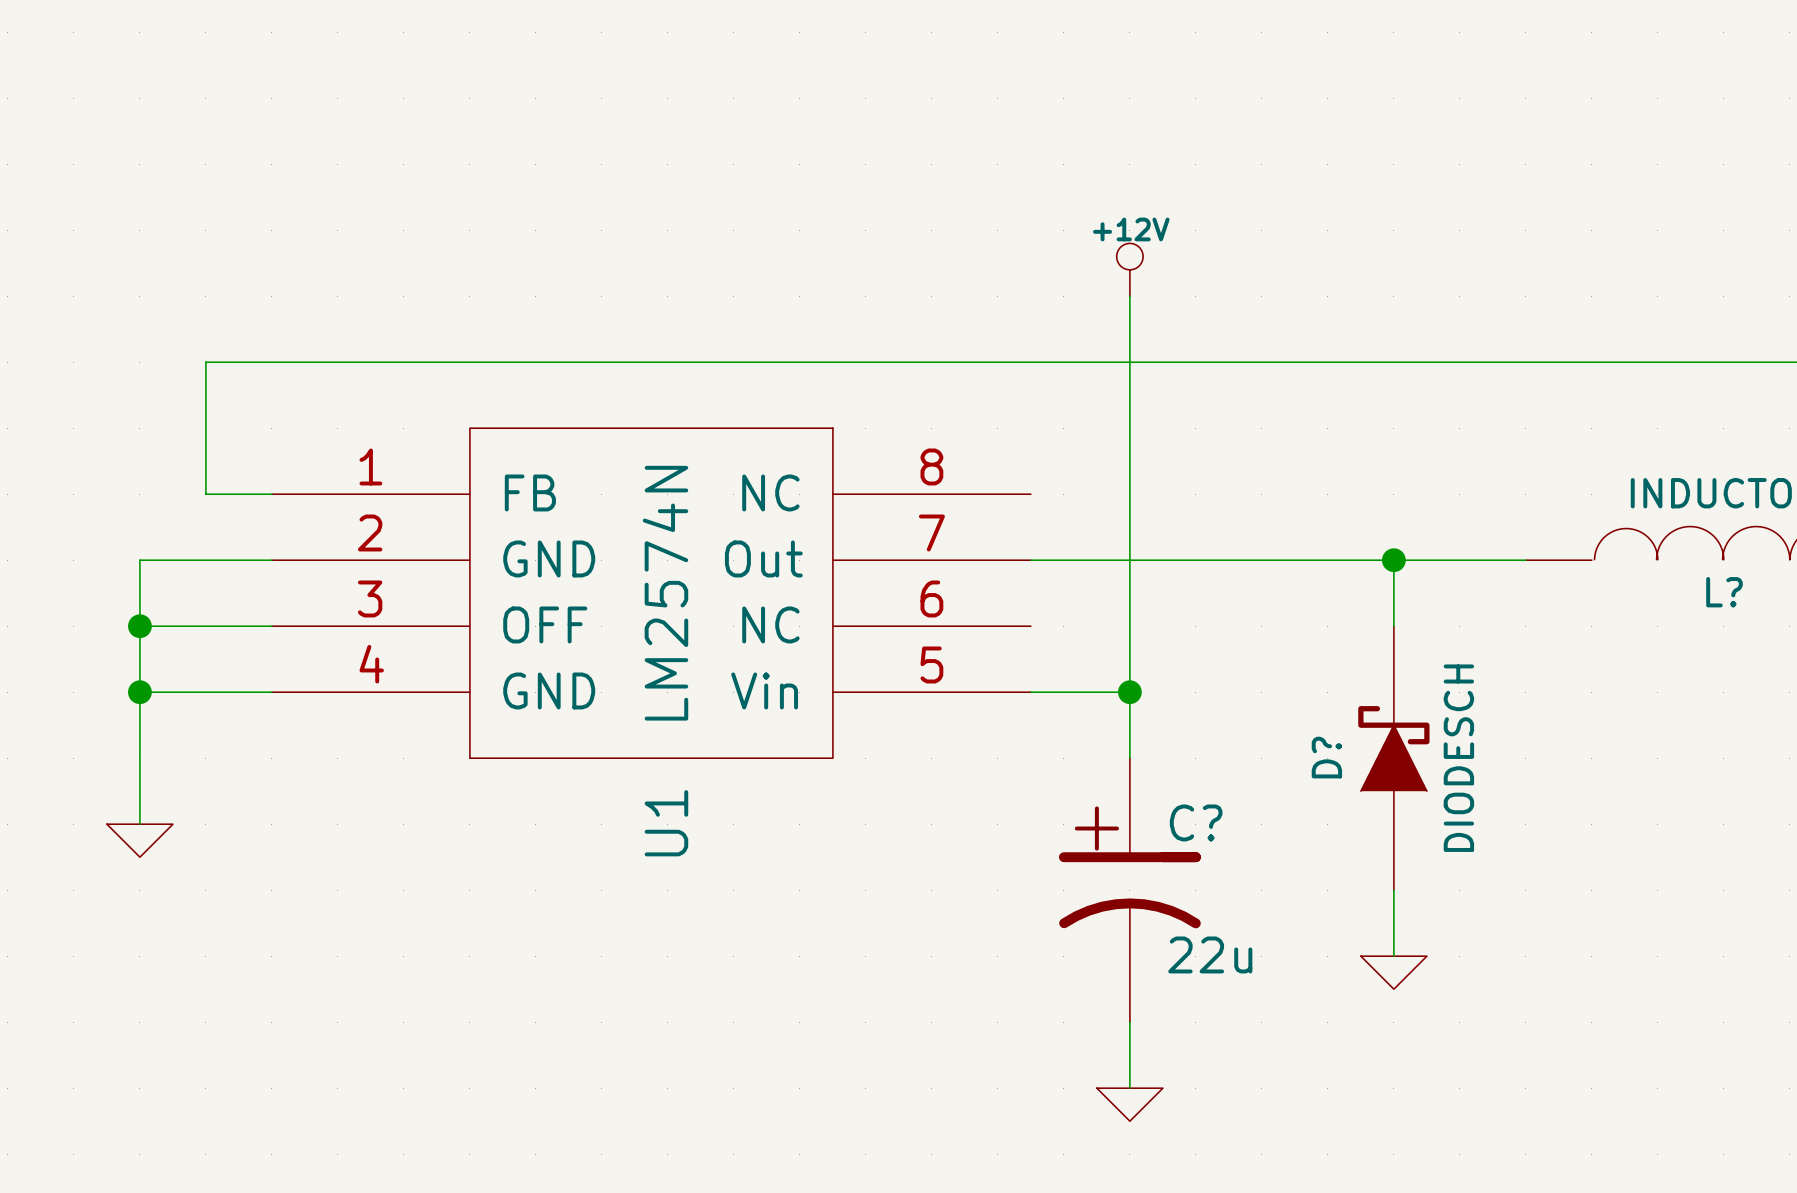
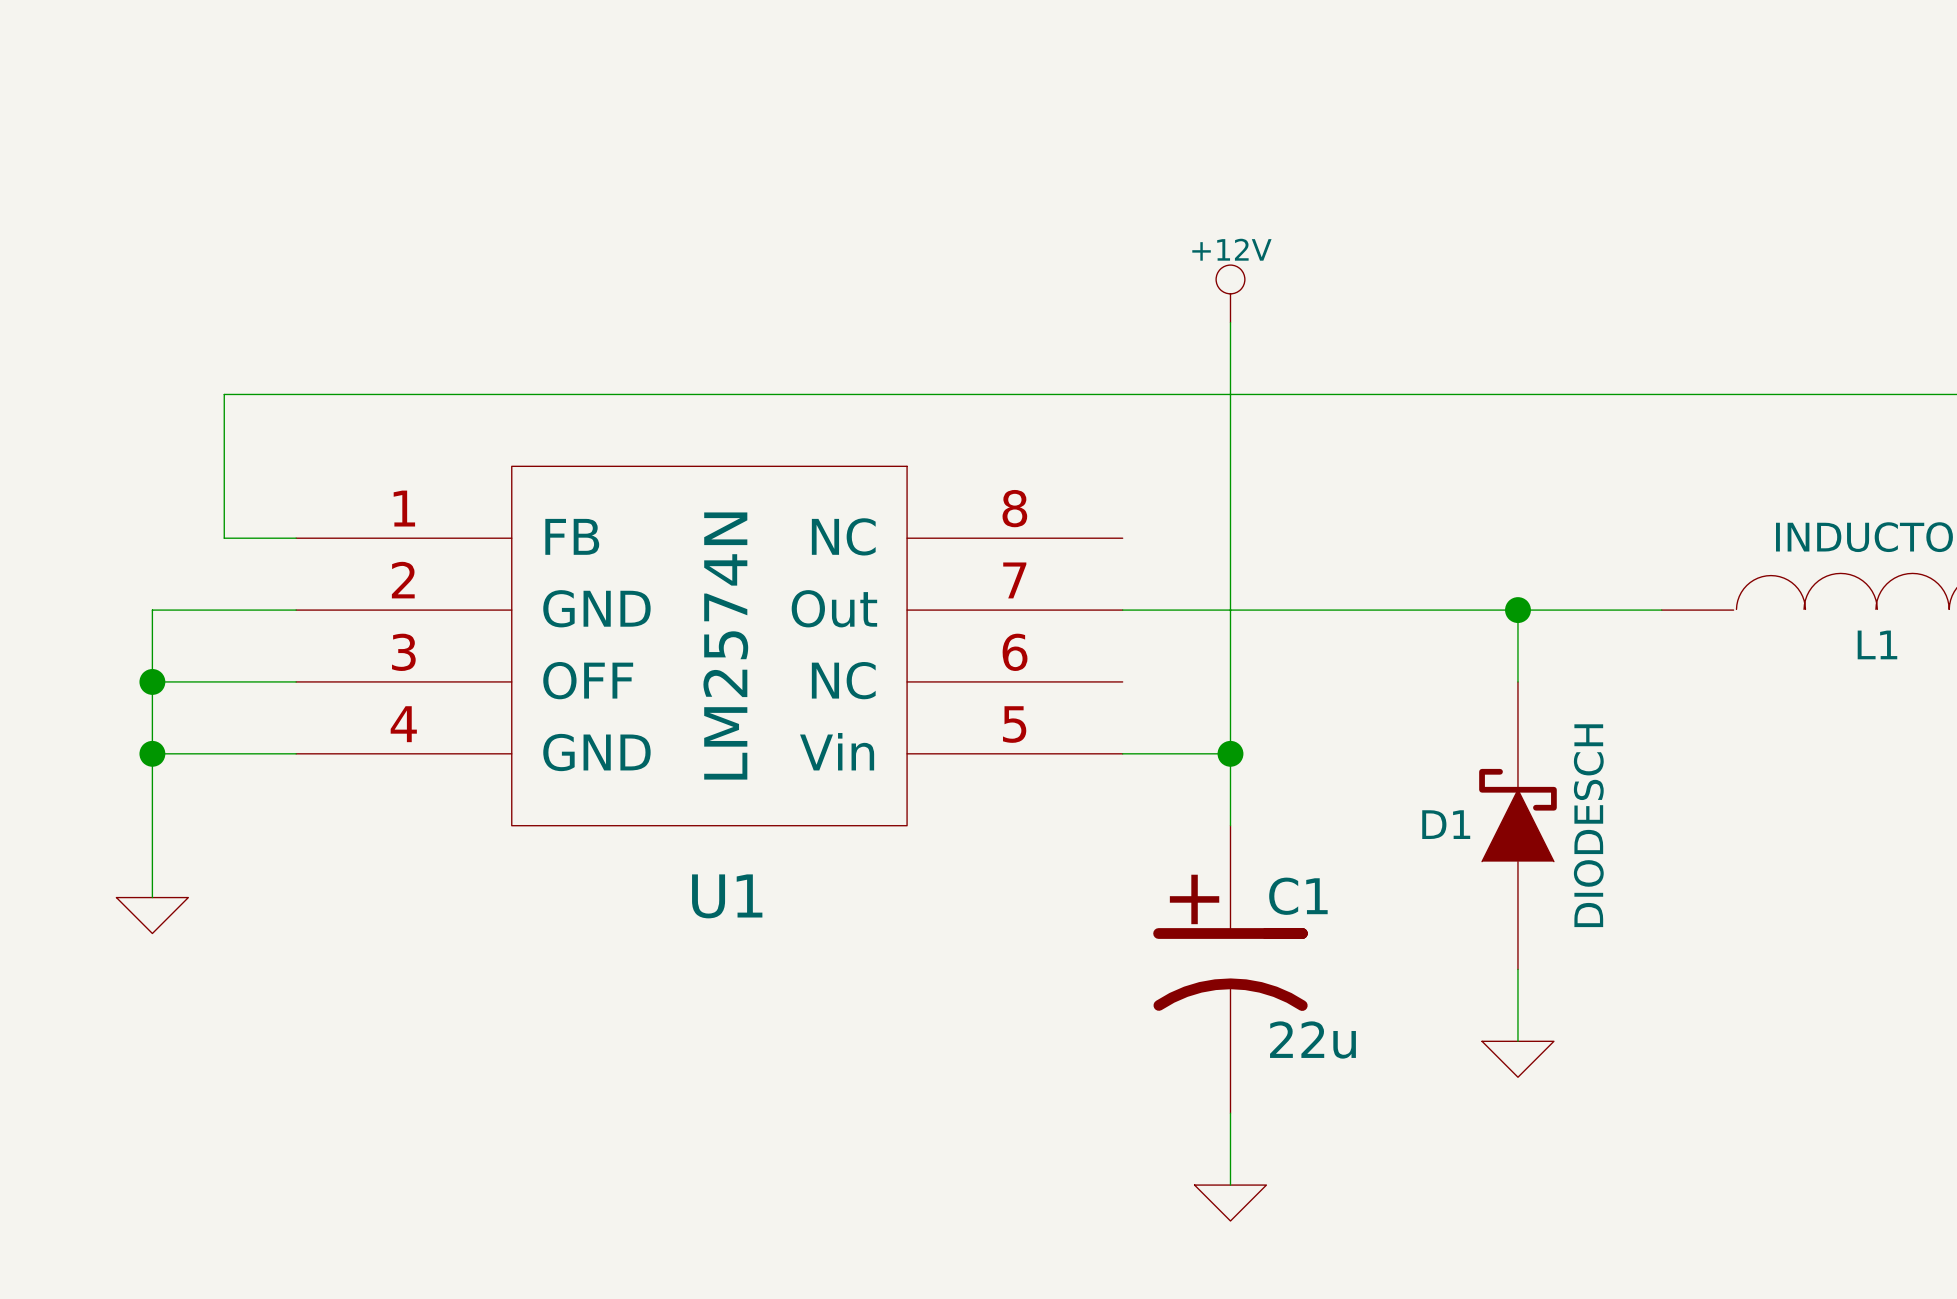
L? name: L? (1724, 592) -> L1 (1877, 644)
D? name: D? (1326, 757) -> D1 (1446, 824)
C? name: C? (1196, 822) -> C1 (1298, 896)
U1 name rotation: 0° (666, 823) -> 90° clockwise (727, 896)

